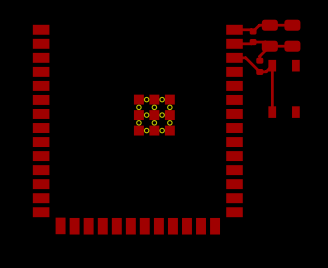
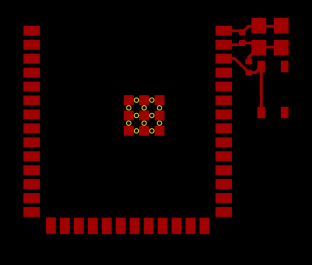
part footprint: [261, 19, 278, 52] -> [251, 17, 267, 56]
part footprint: [284, 19, 301, 52] -> [273, 17, 289, 56]

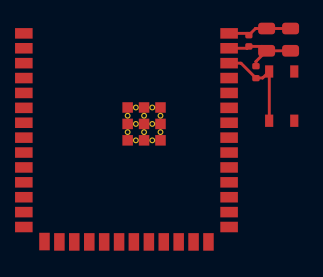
part footprint: [251, 17, 267, 56] -> [258, 22, 276, 57]
part footprint: [273, 17, 289, 56] -> [282, 22, 300, 57]

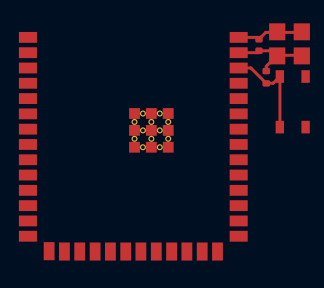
part footprint: [258, 22, 276, 57] -> [269, 23, 286, 65]
part footprint: [282, 22, 300, 57] -> [293, 23, 310, 65]

